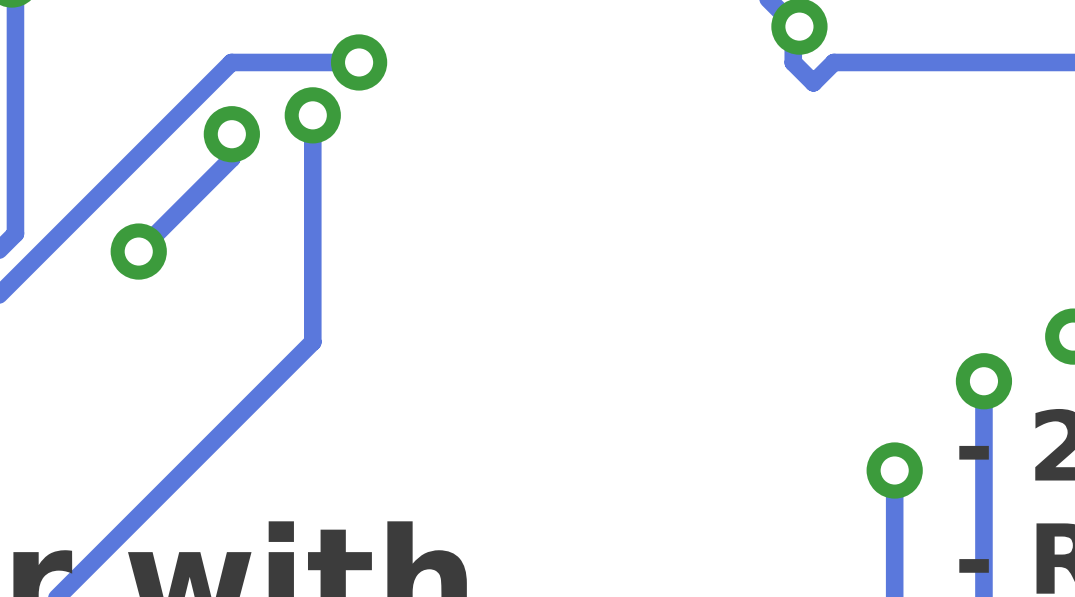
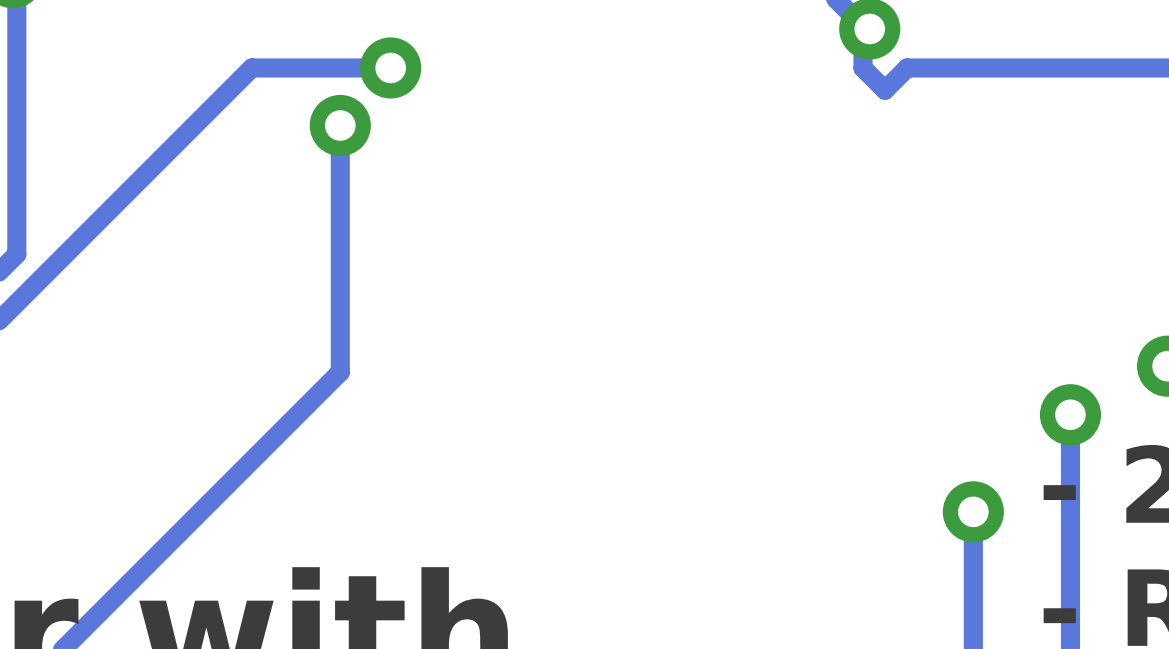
track: (231, 134) (231, 158) (138, 251) -> none
via: (231, 134) -> none
via: (138, 251) -> none

